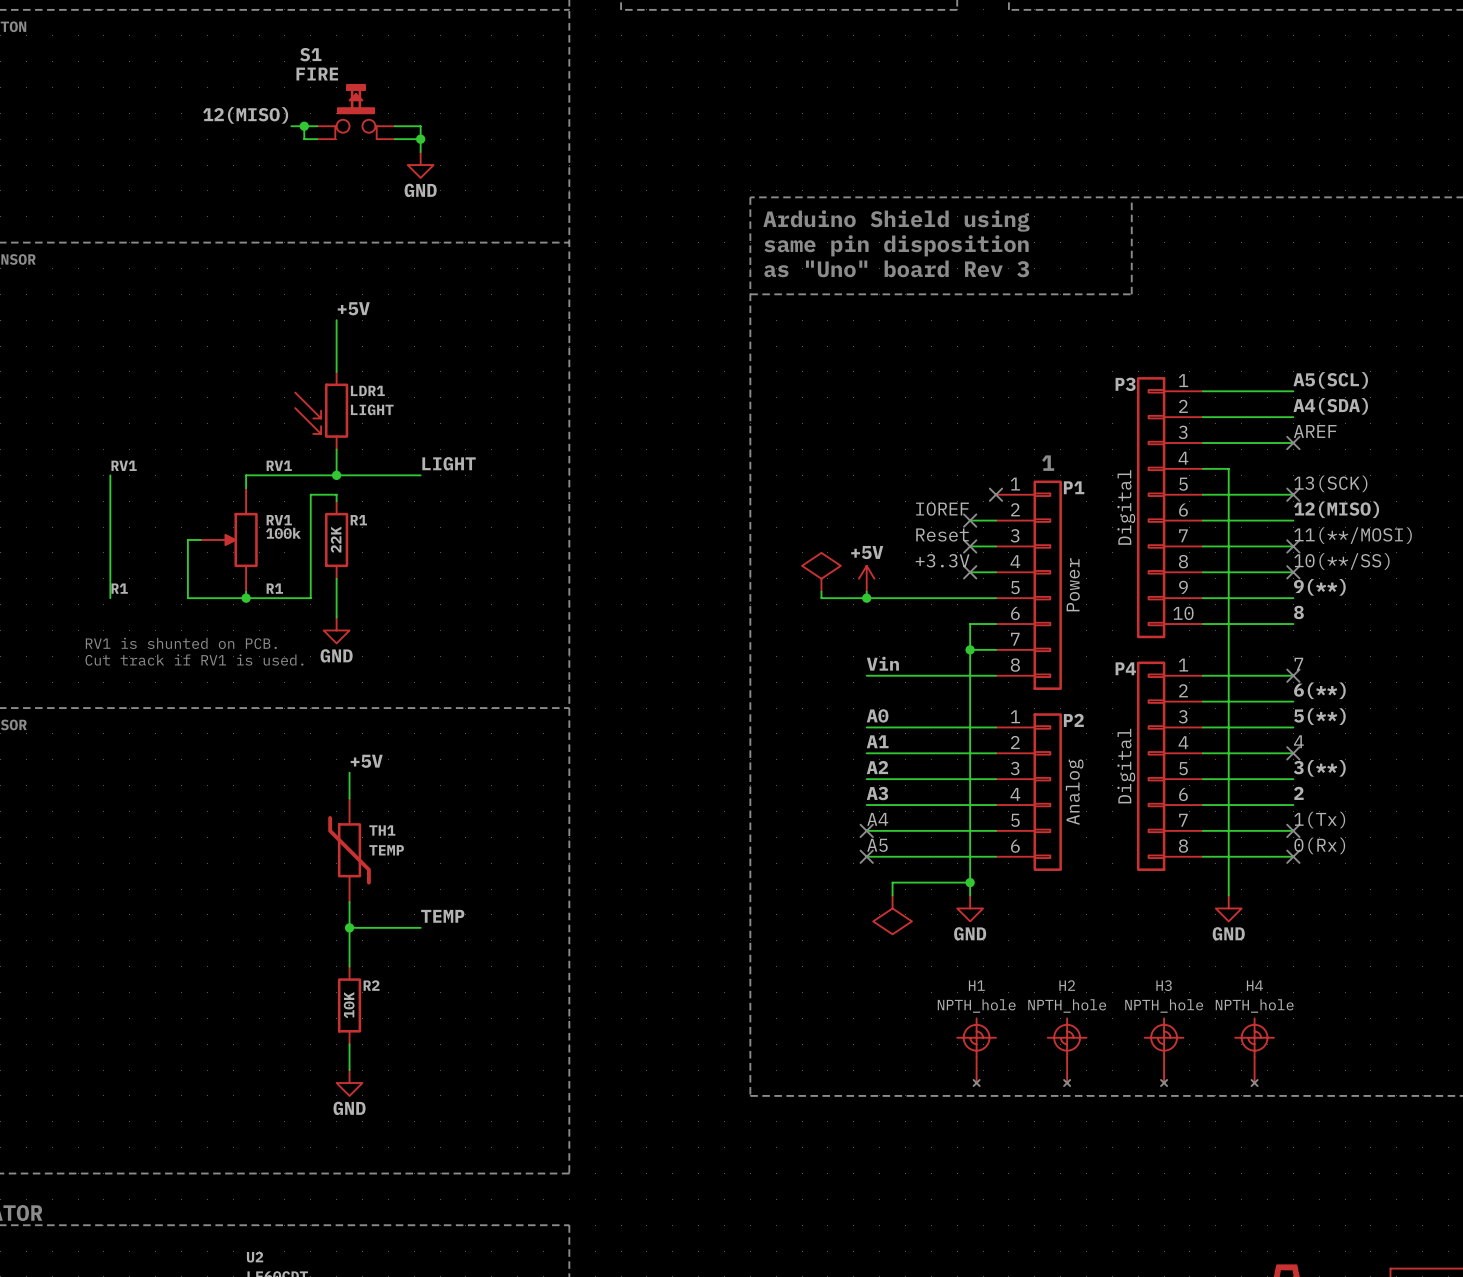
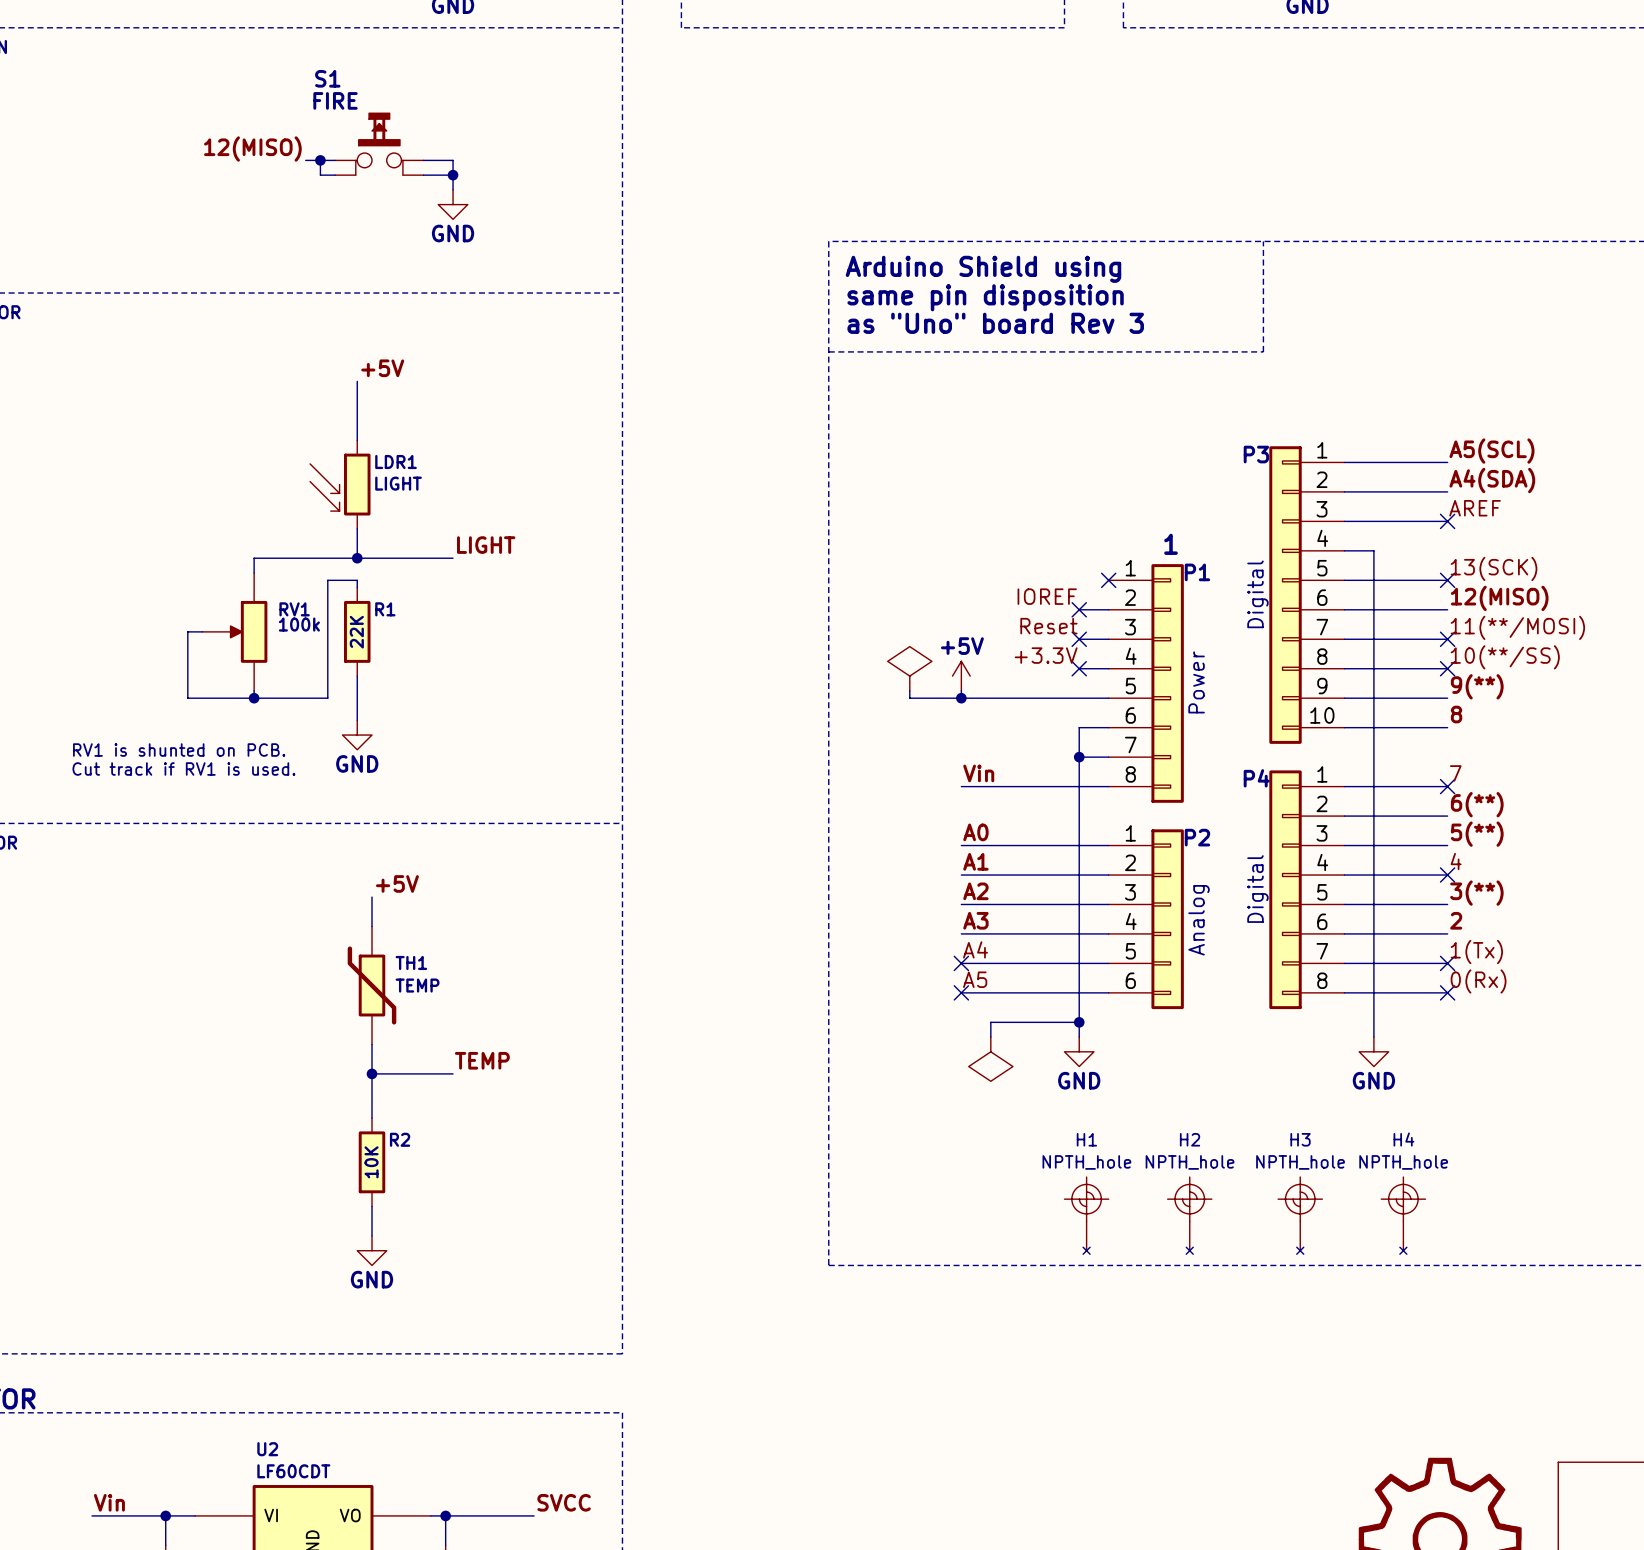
label: RV1 (124, 465) -> none
label: RV1 (279, 465) -> none
wire: (110, 475) (110, 598) -> none
label: R1 (119, 588) -> none
label: R1 (274, 588) -> none

